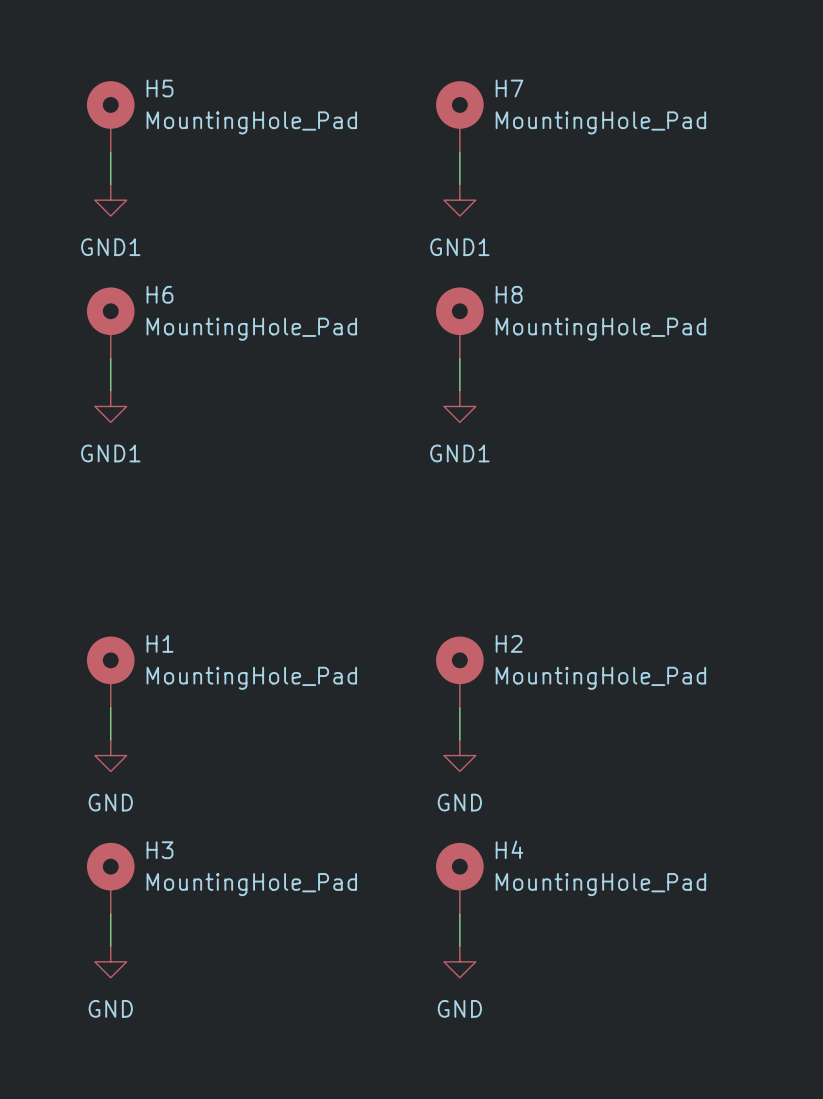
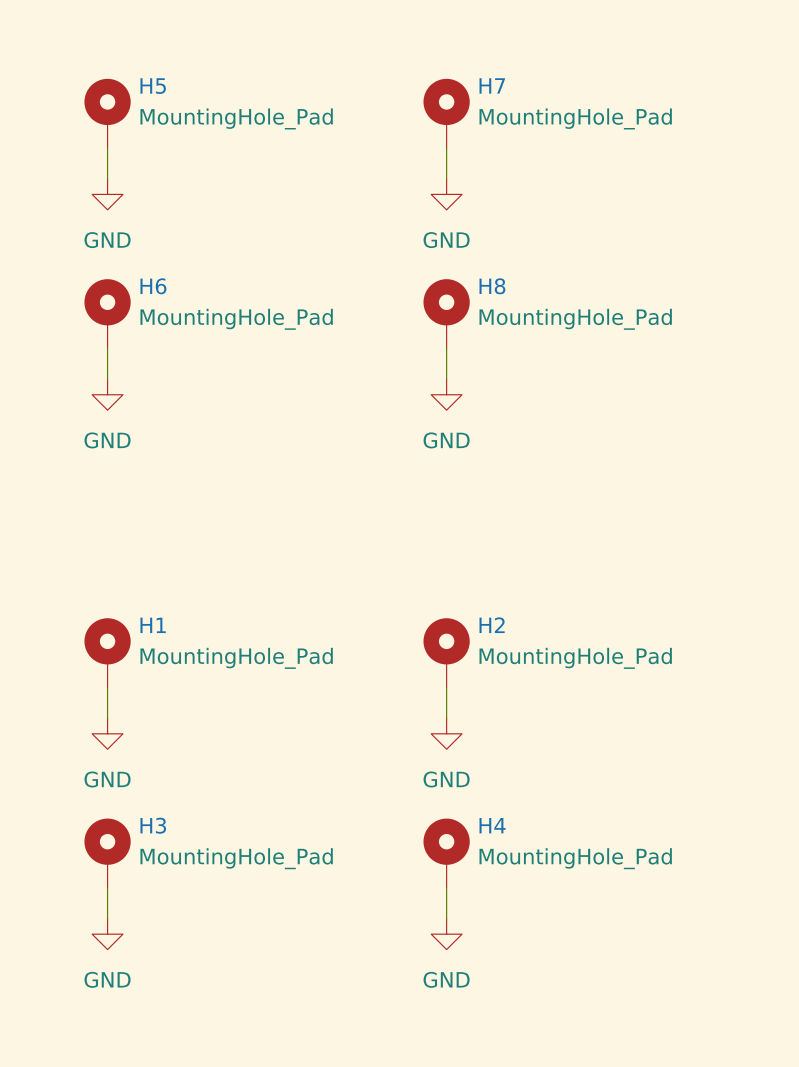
power symbol: GND1 (110, 200) -> GND (107, 194)
power symbol: GND1 (459, 200) -> GND (446, 194)
power symbol: GND1 (110, 406) -> GND (107, 394)
power symbol: GND1 (459, 406) -> GND (446, 394)

